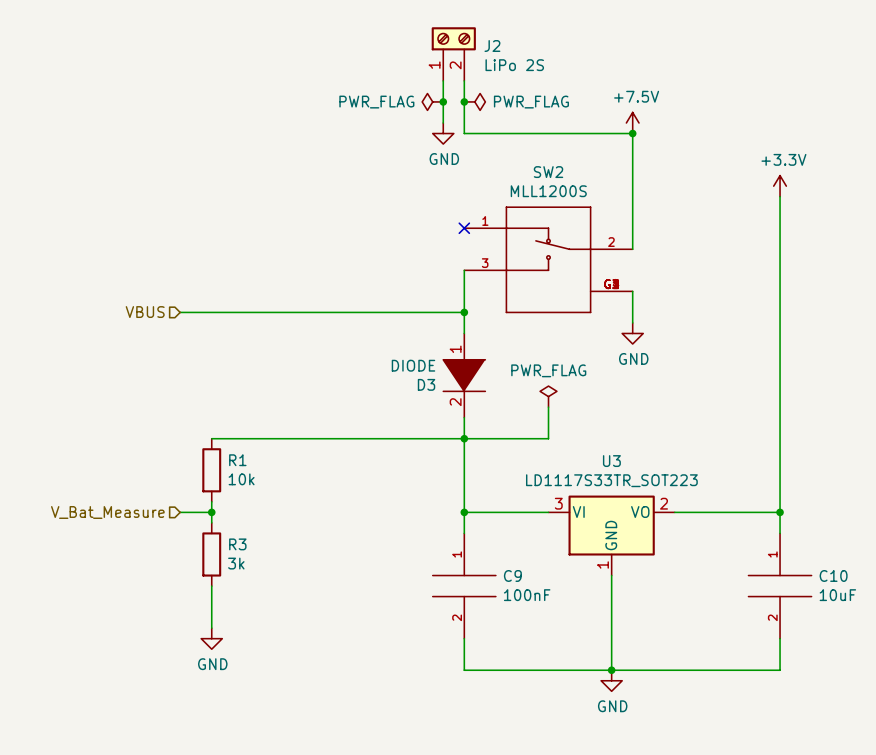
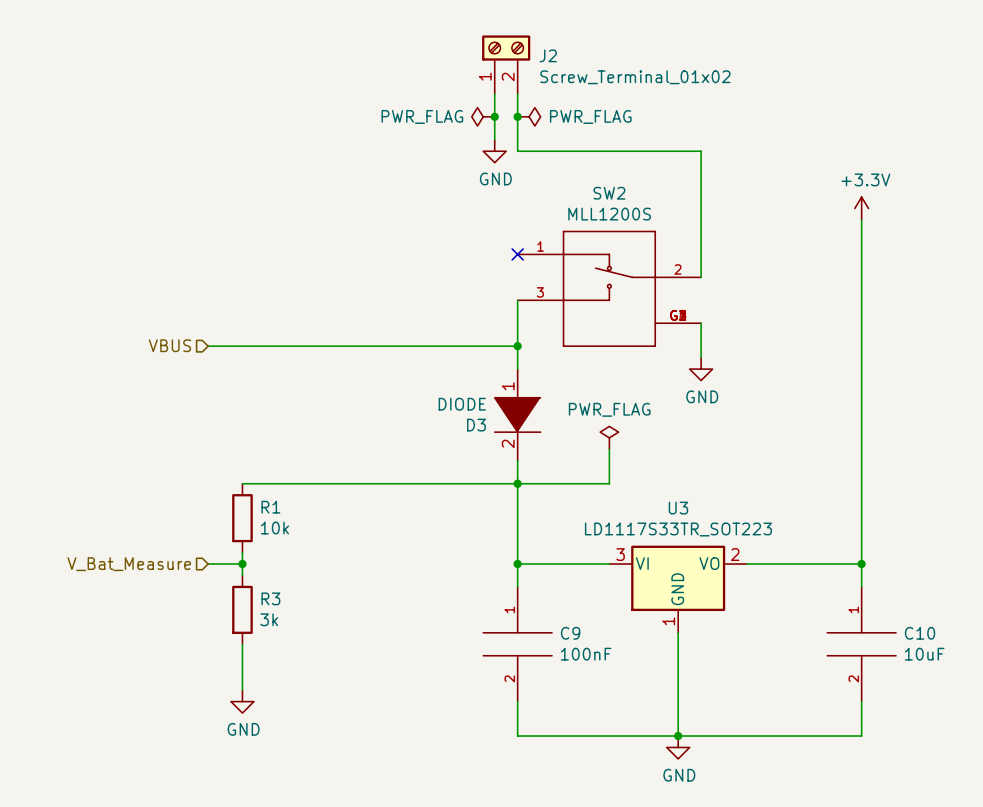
J2 value: LiPo 2S (514, 65) -> Screw_Terminal_01x02 (635, 77)
power symbol: +7.5V (632, 123) -> none
junction: (632, 133) -> none

